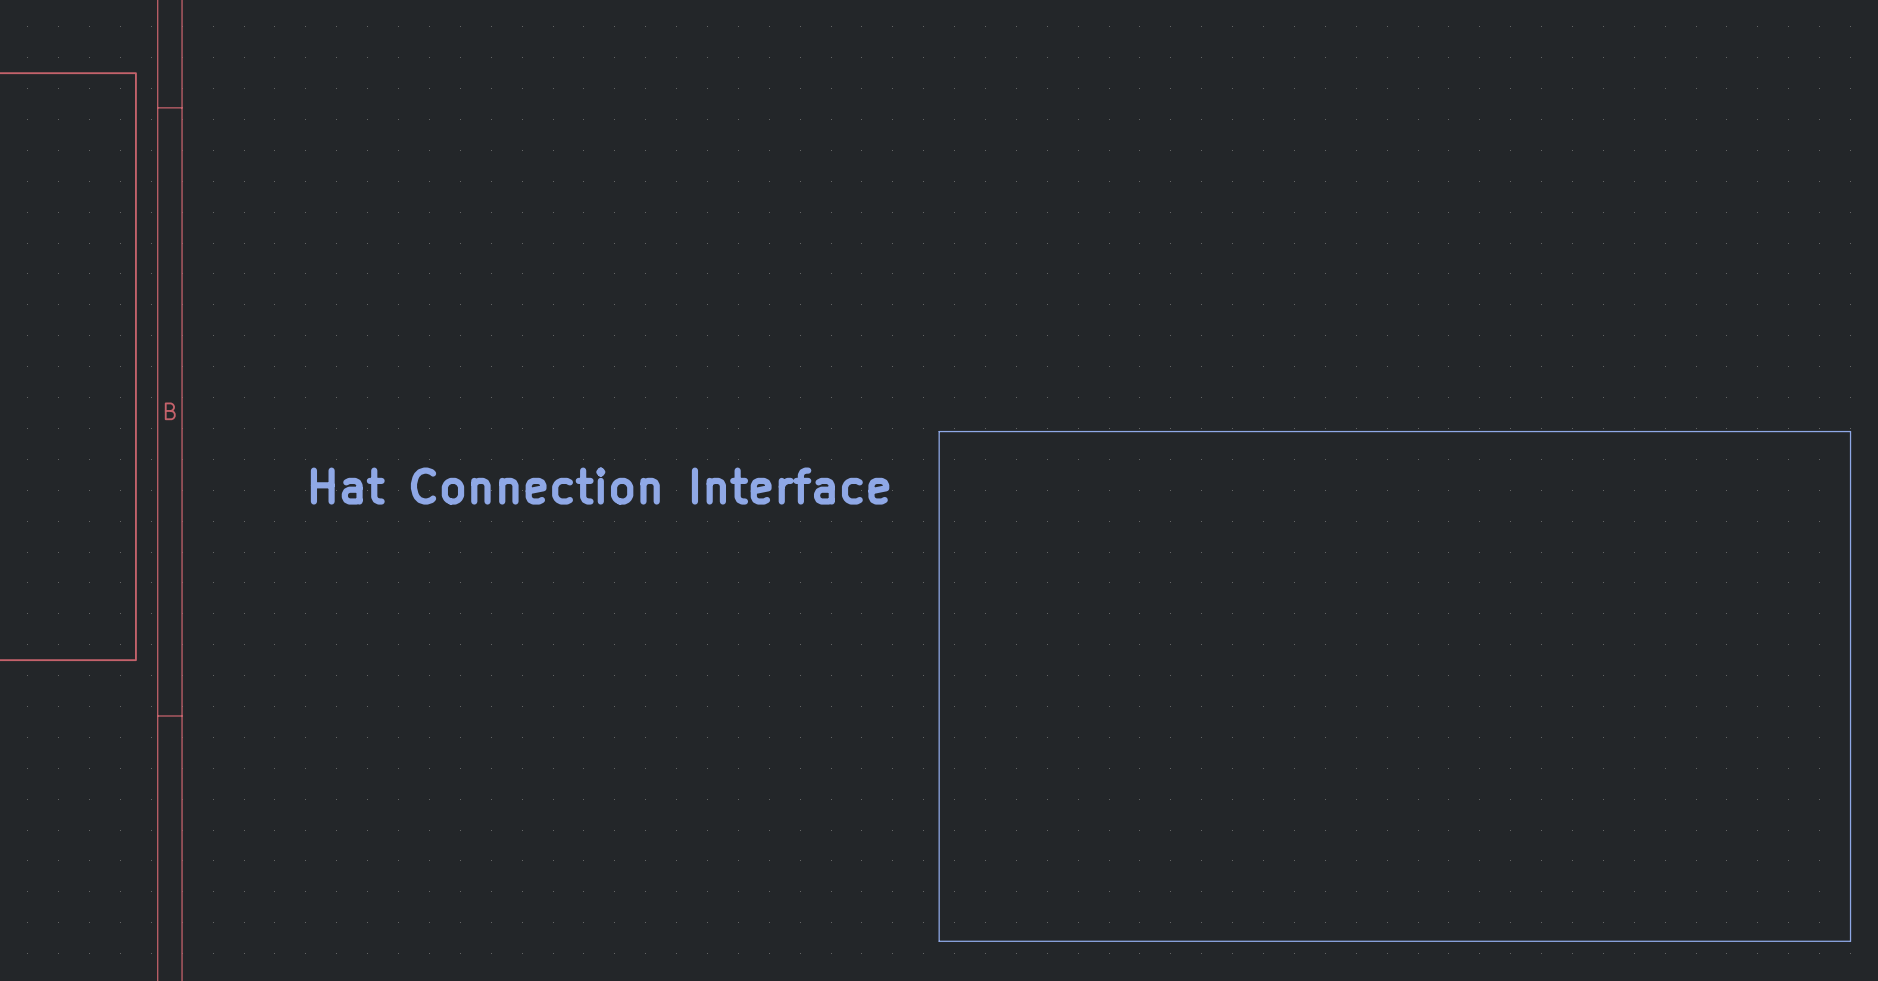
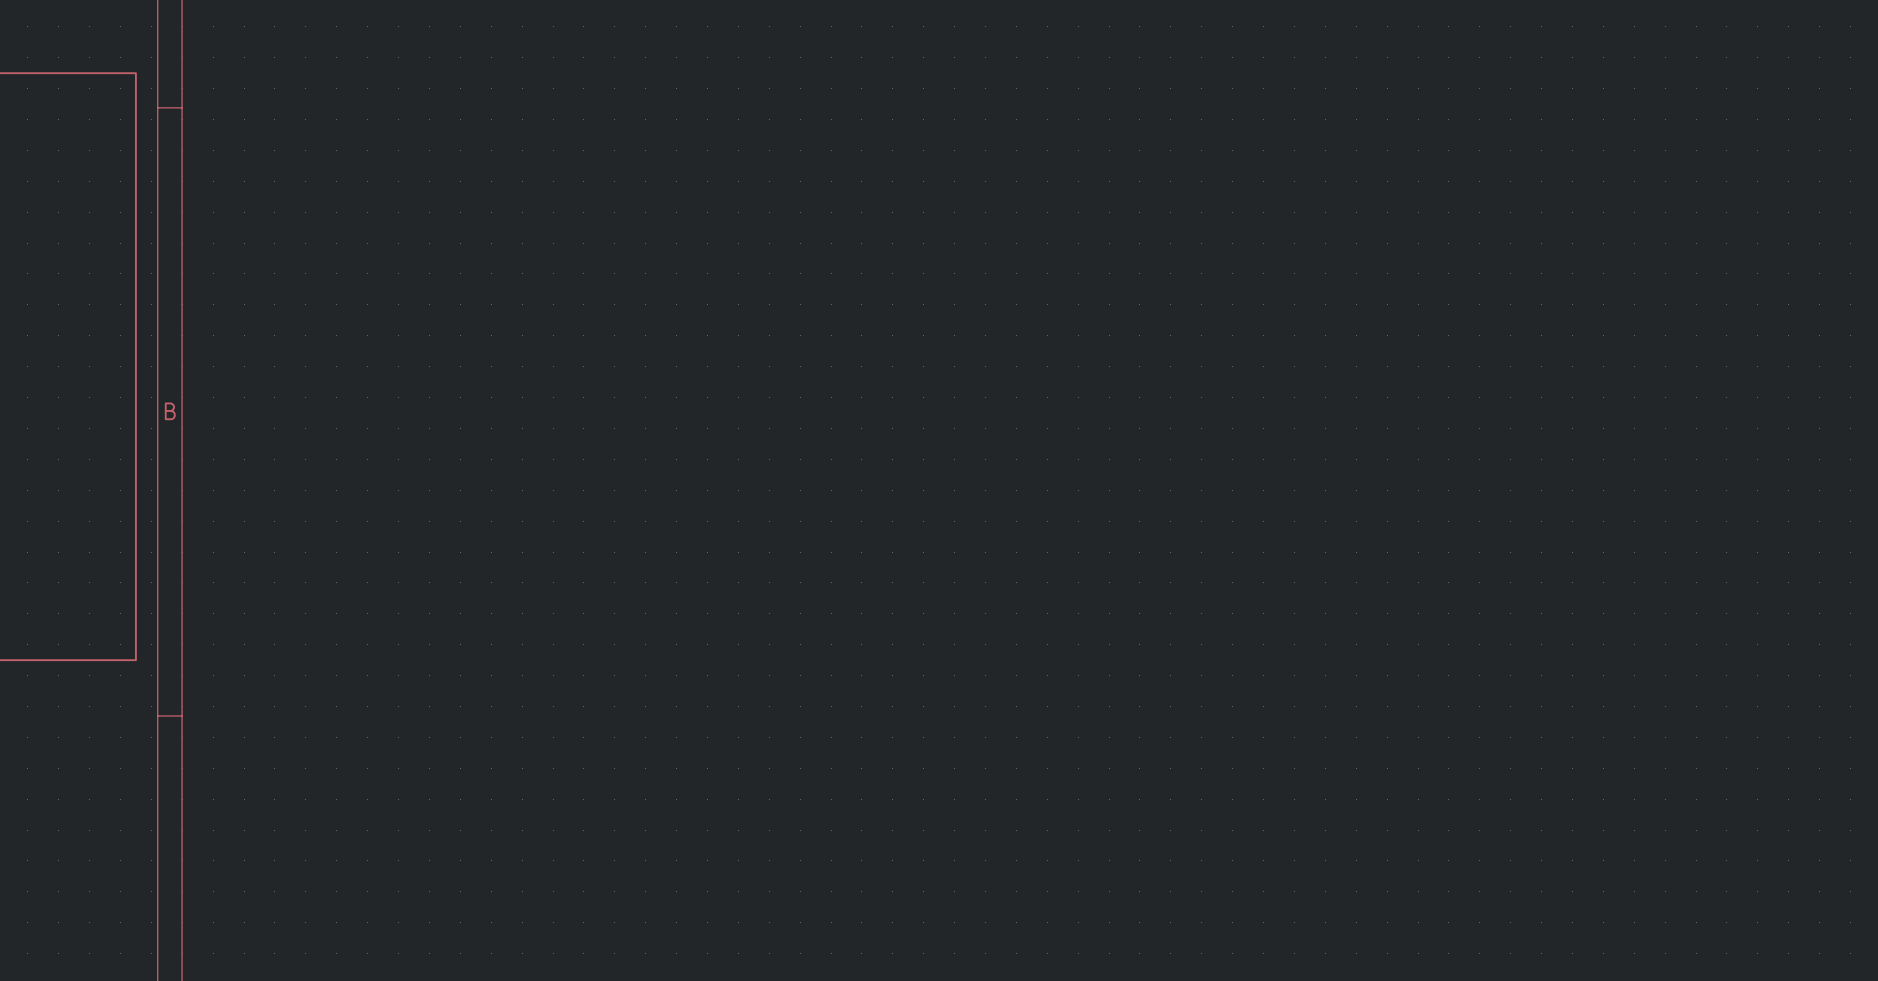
line: (939, 431) (1850, 431) (1850, 941) (939, 941) (939, 431) -> none
text: Hat Connection Interface (600, 486) -> none

